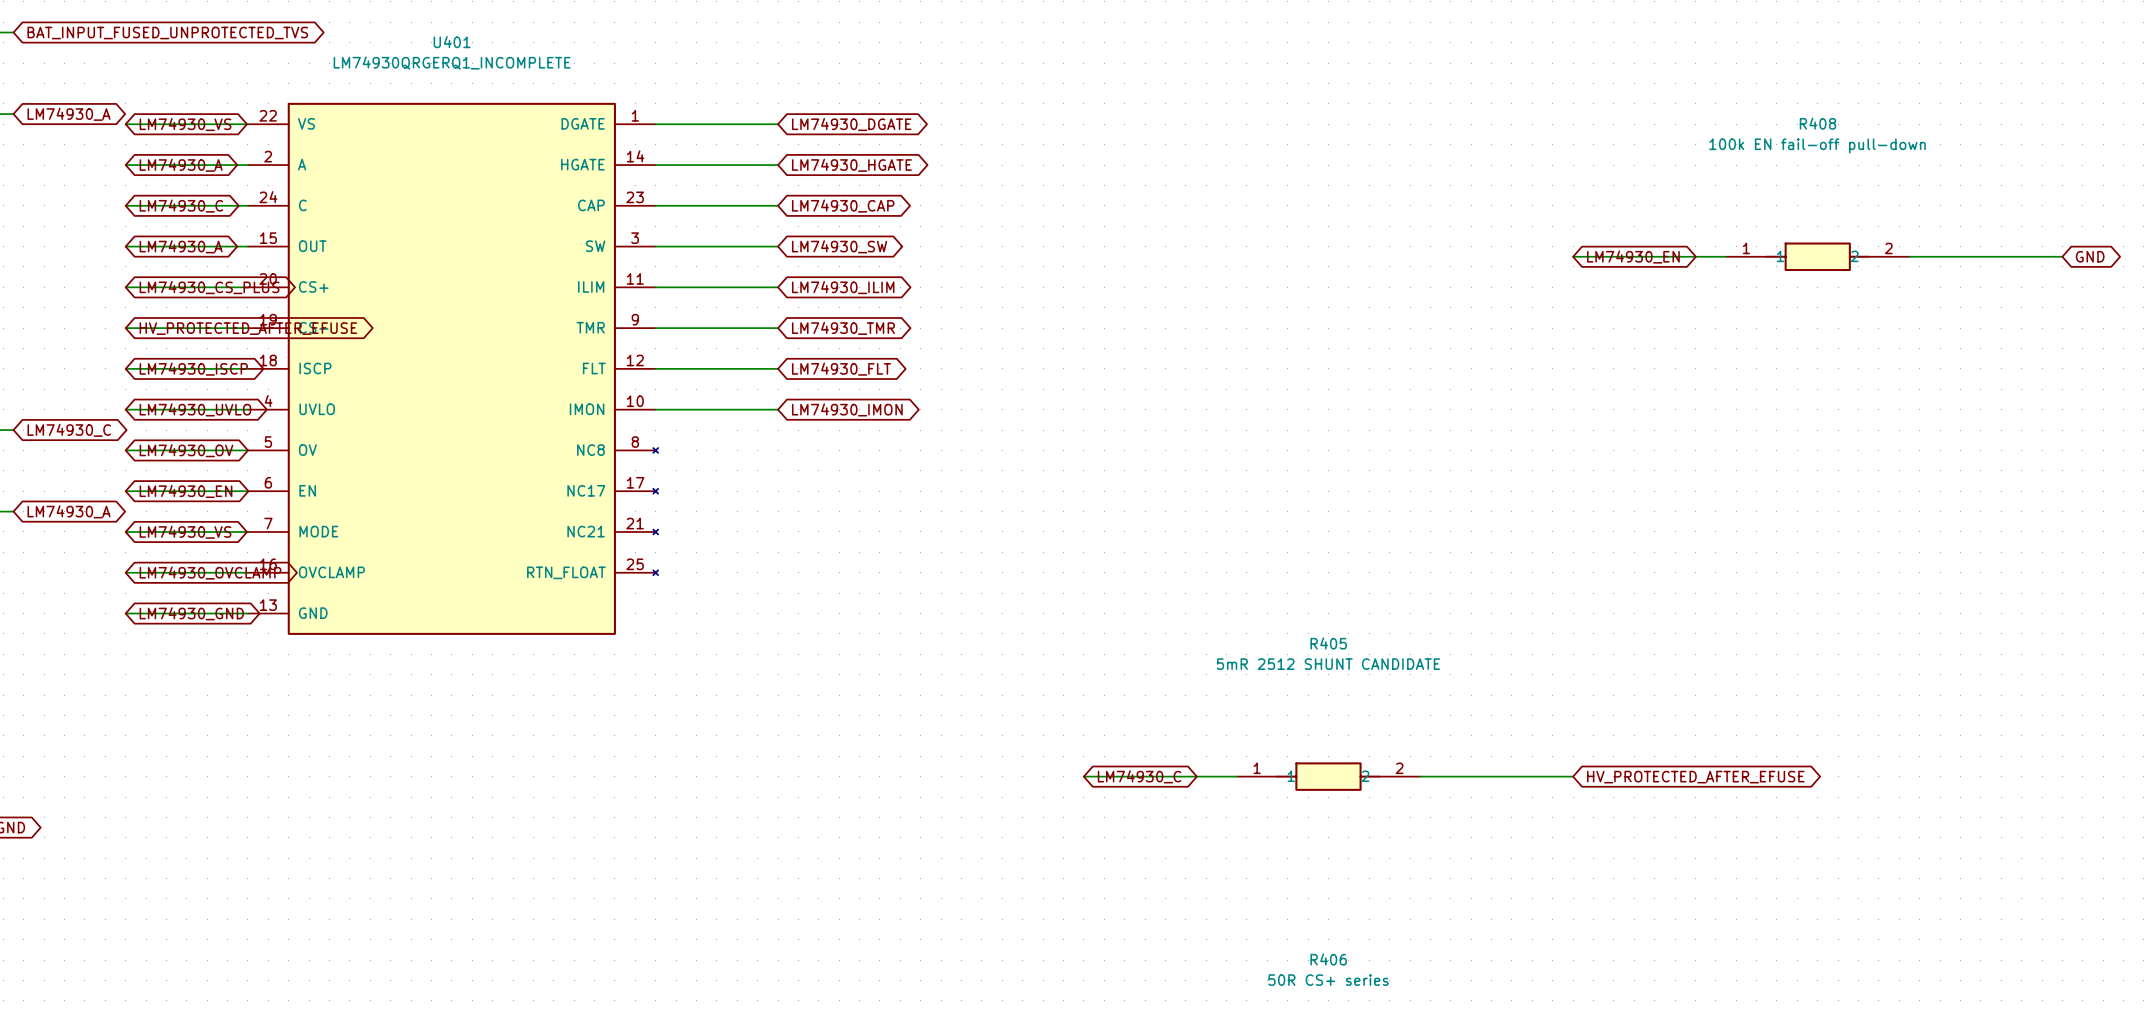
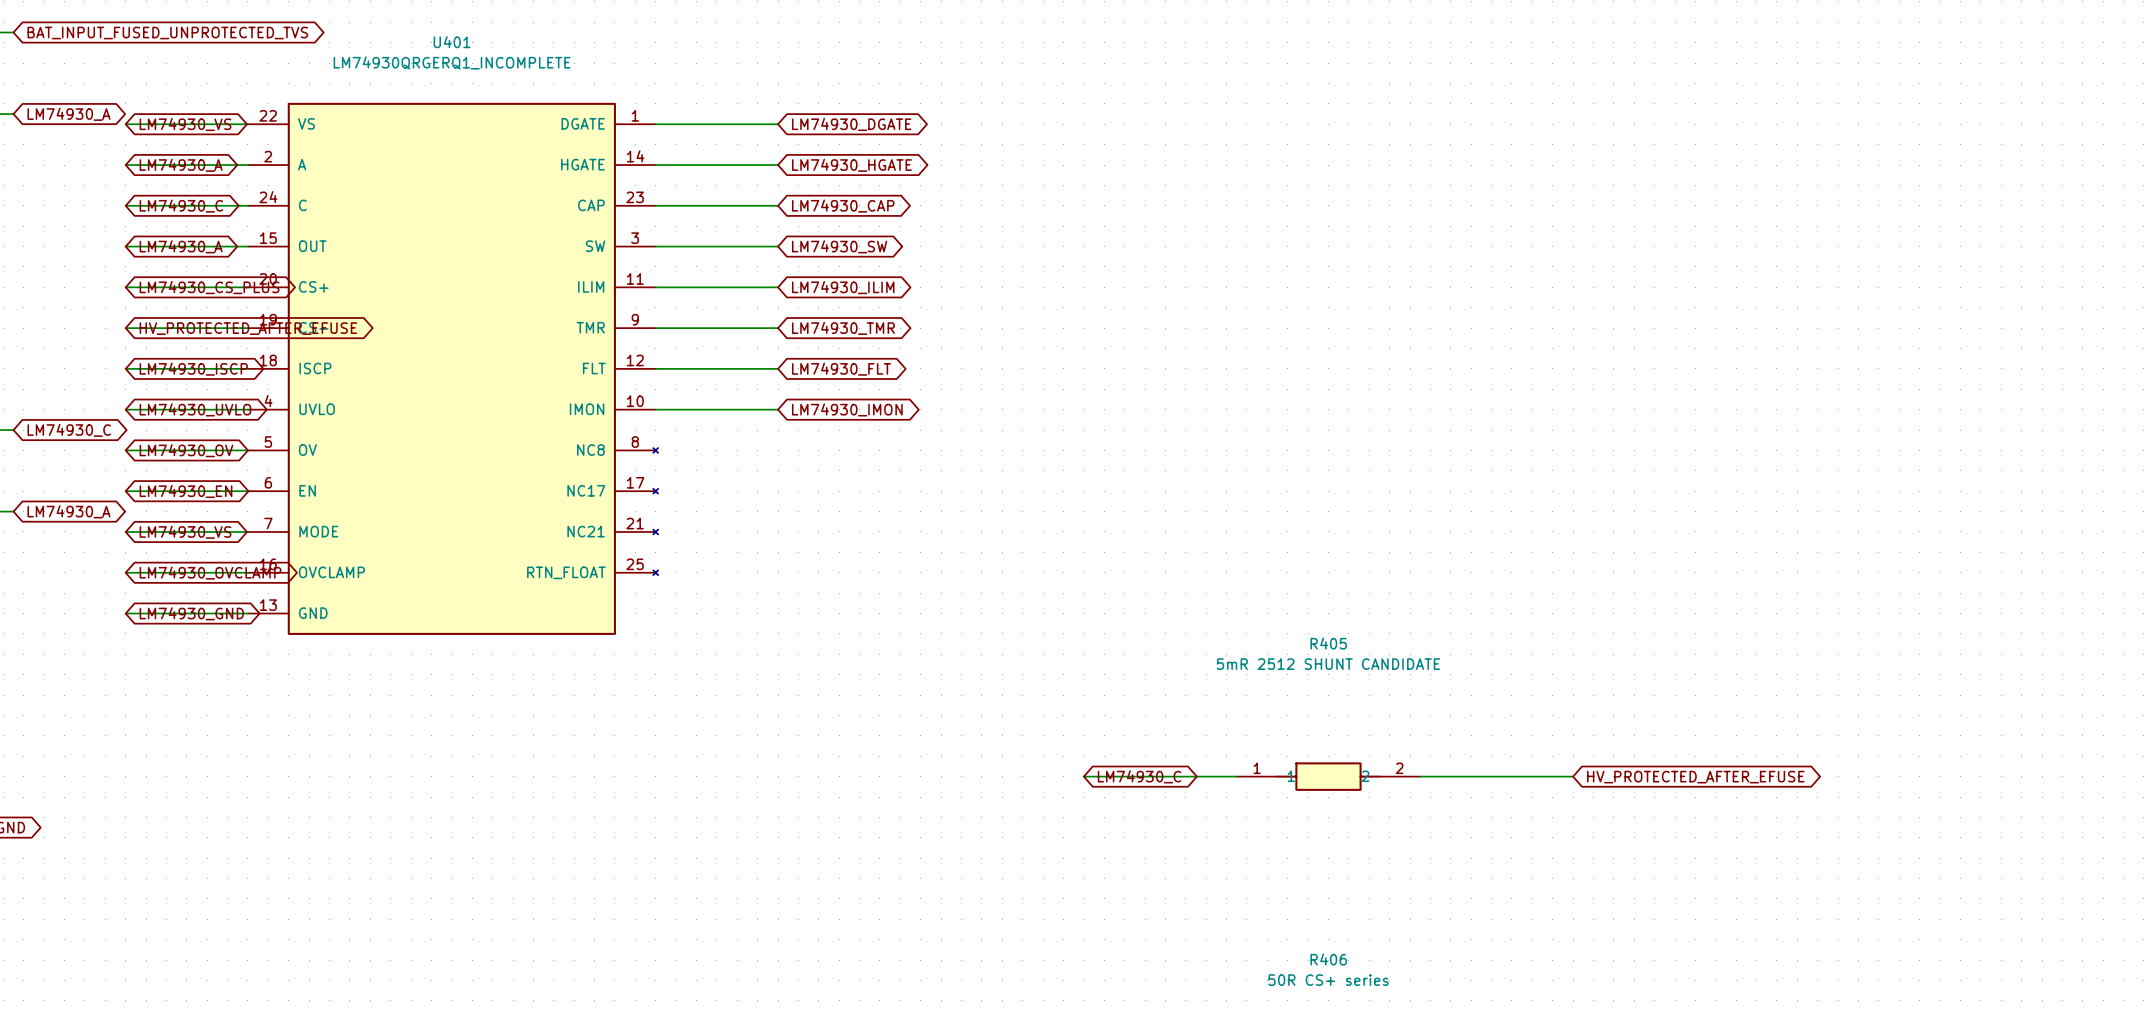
wire: (1573, 256) (1726, 256) -> none
R408: 100k EN fail-off pull-down (1817, 256) -> none
wire: (1909, 256) (2062, 256) -> none
global label: GND (2090, 256) -> none
global label: LM74930_EN (1633, 257) -> none

